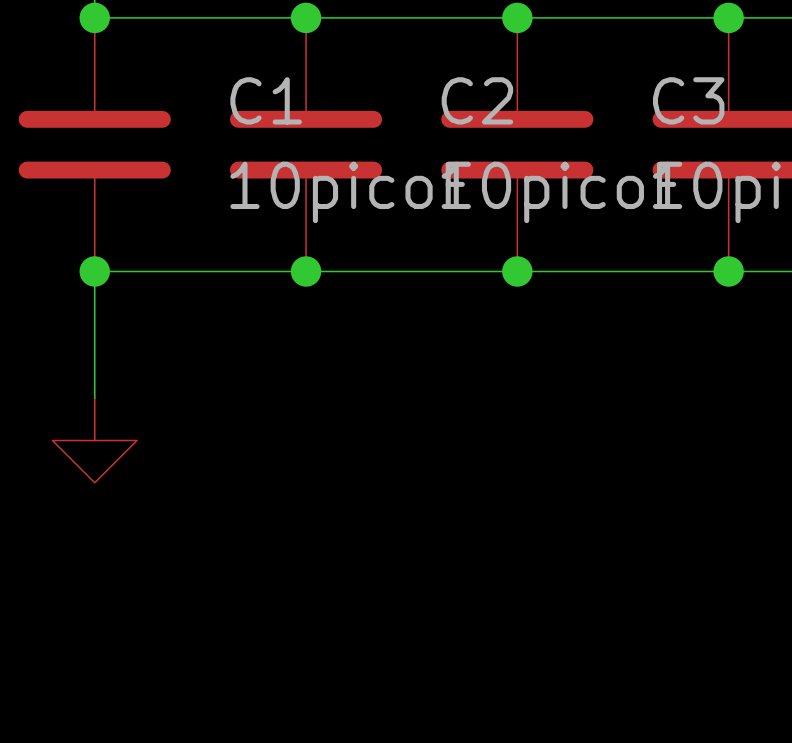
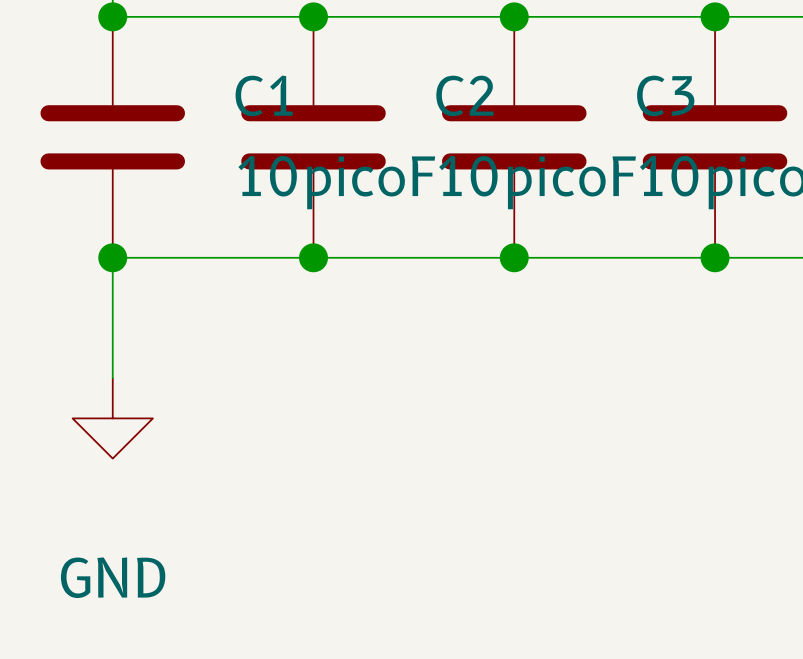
power symbol text: none -> GND (113, 577)

